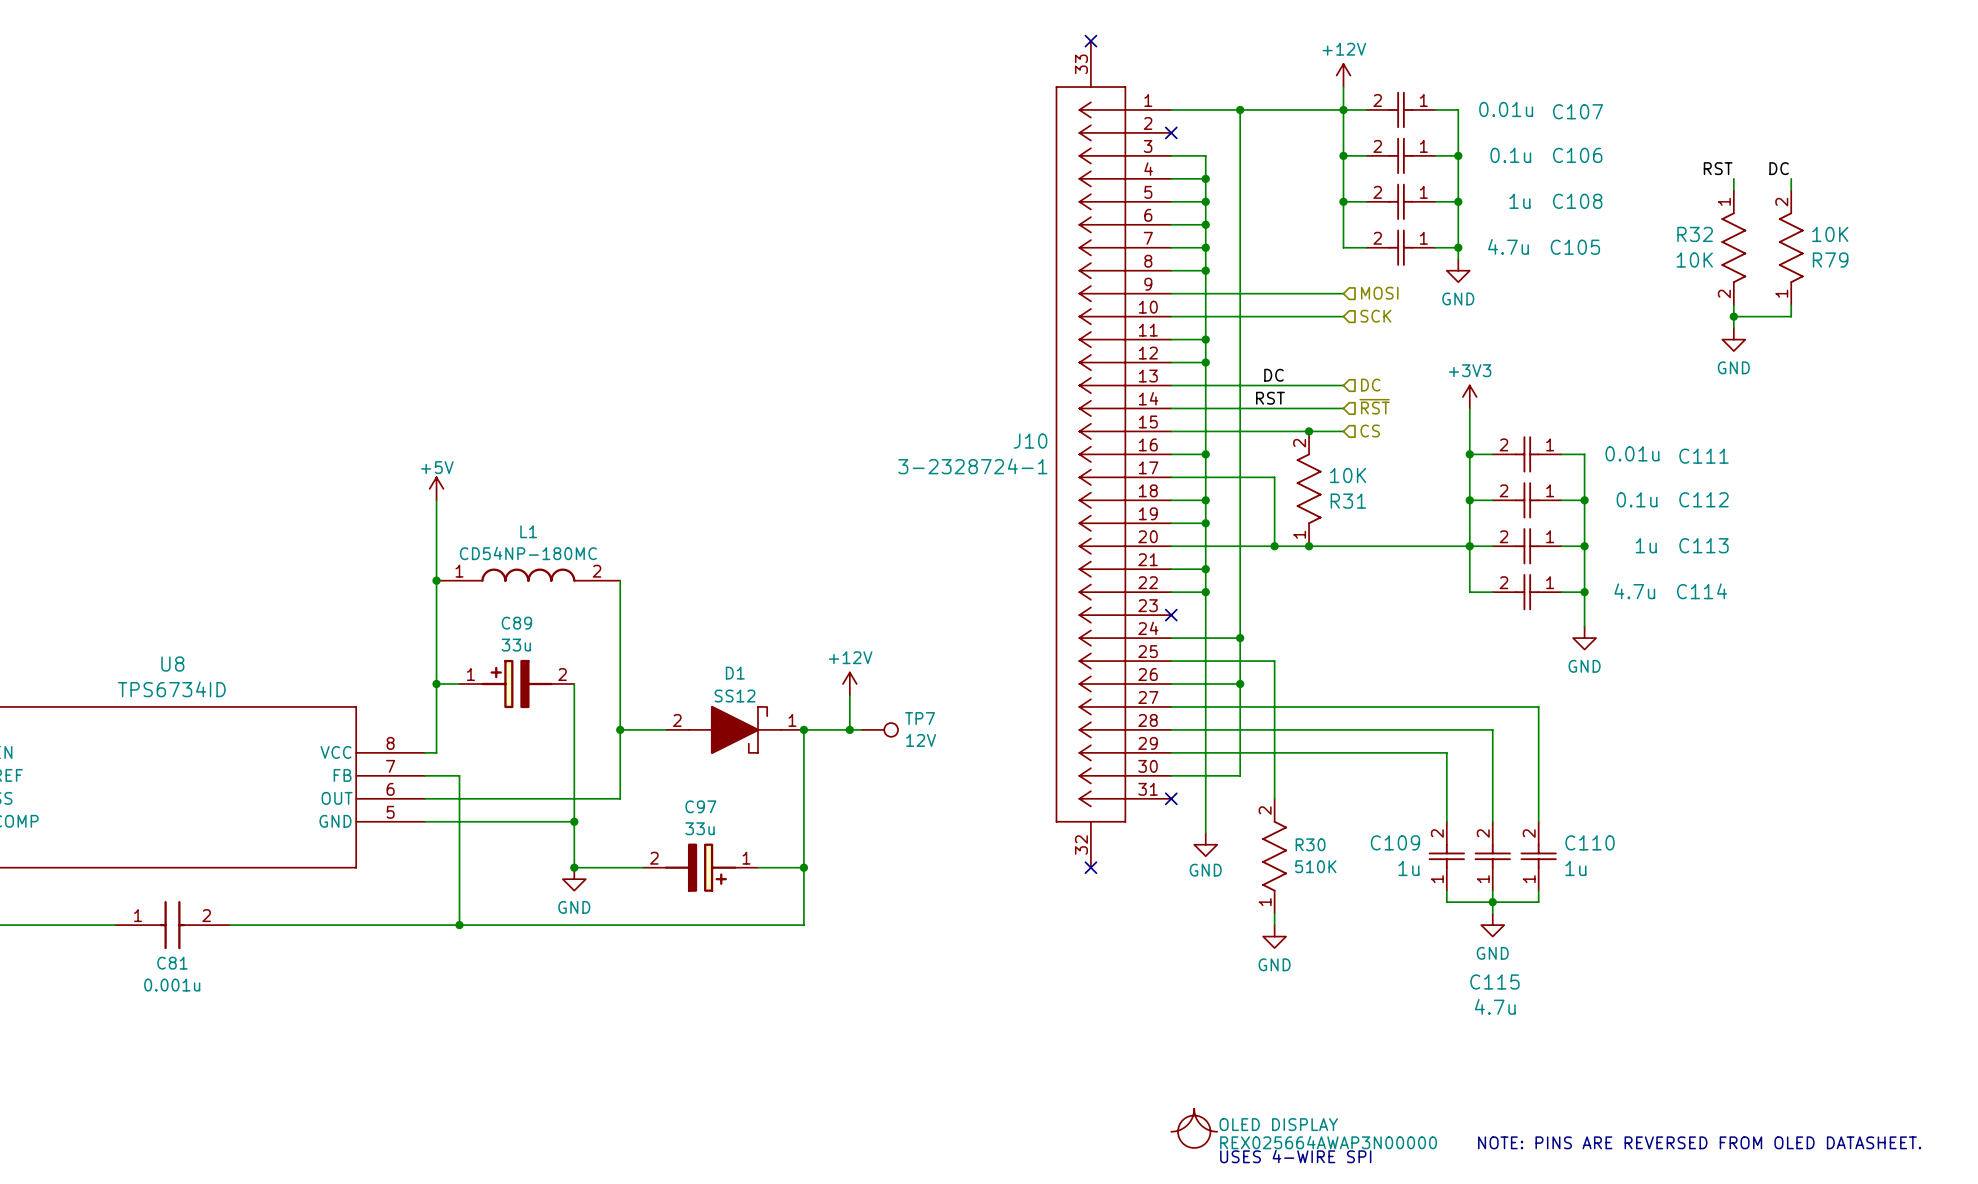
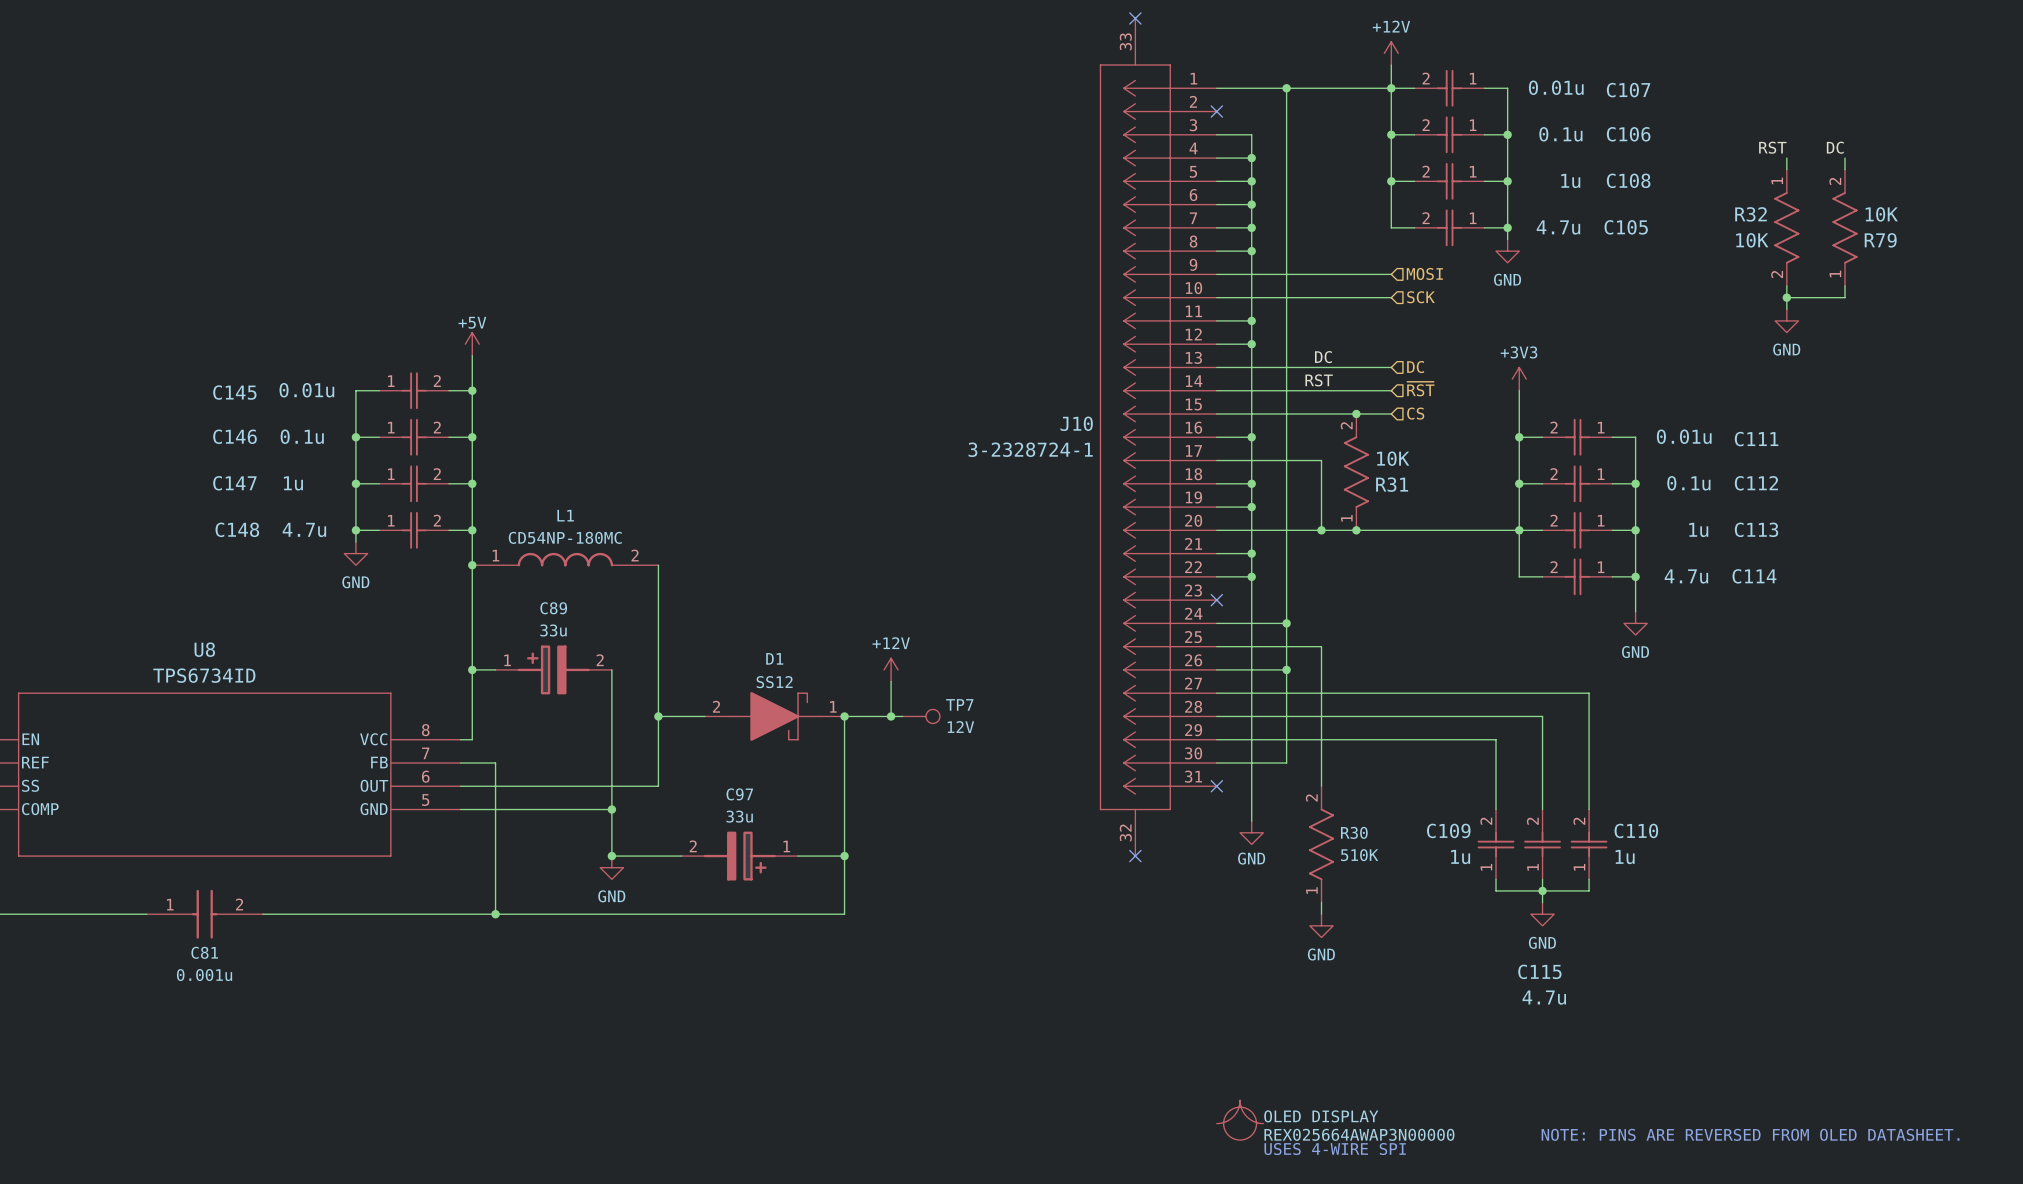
wire: none -> (472, 355) (472, 483) (449, 483)
wire: none -> (379, 390) (355, 390) (355, 541)
C145: none -> 0.01u (414, 390)
wire: none -> (449, 390) (472, 390)
junction: none -> (472, 390)
wire: none -> (355, 437) (379, 437)
junction: none -> (355, 437)
C146: none -> 0.1u (414, 437)
wire: none -> (449, 437) (472, 437)
junction: none -> (472, 437)
power symbol position: +5V (436, 488) -> +5V (472, 344)
wire: none -> (355, 483) (379, 483)
junction: none -> (355, 483)
C147: none -> 1u (414, 483)
junction: none -> (472, 483)
wire: none -> (355, 530) (379, 530)
junction: none -> (355, 530)
C148: none -> 4.7u (414, 530)
wire: none -> (449, 530) (472, 530)
junction: none -> (472, 530)
power symbol: none -> GND (355, 553)

